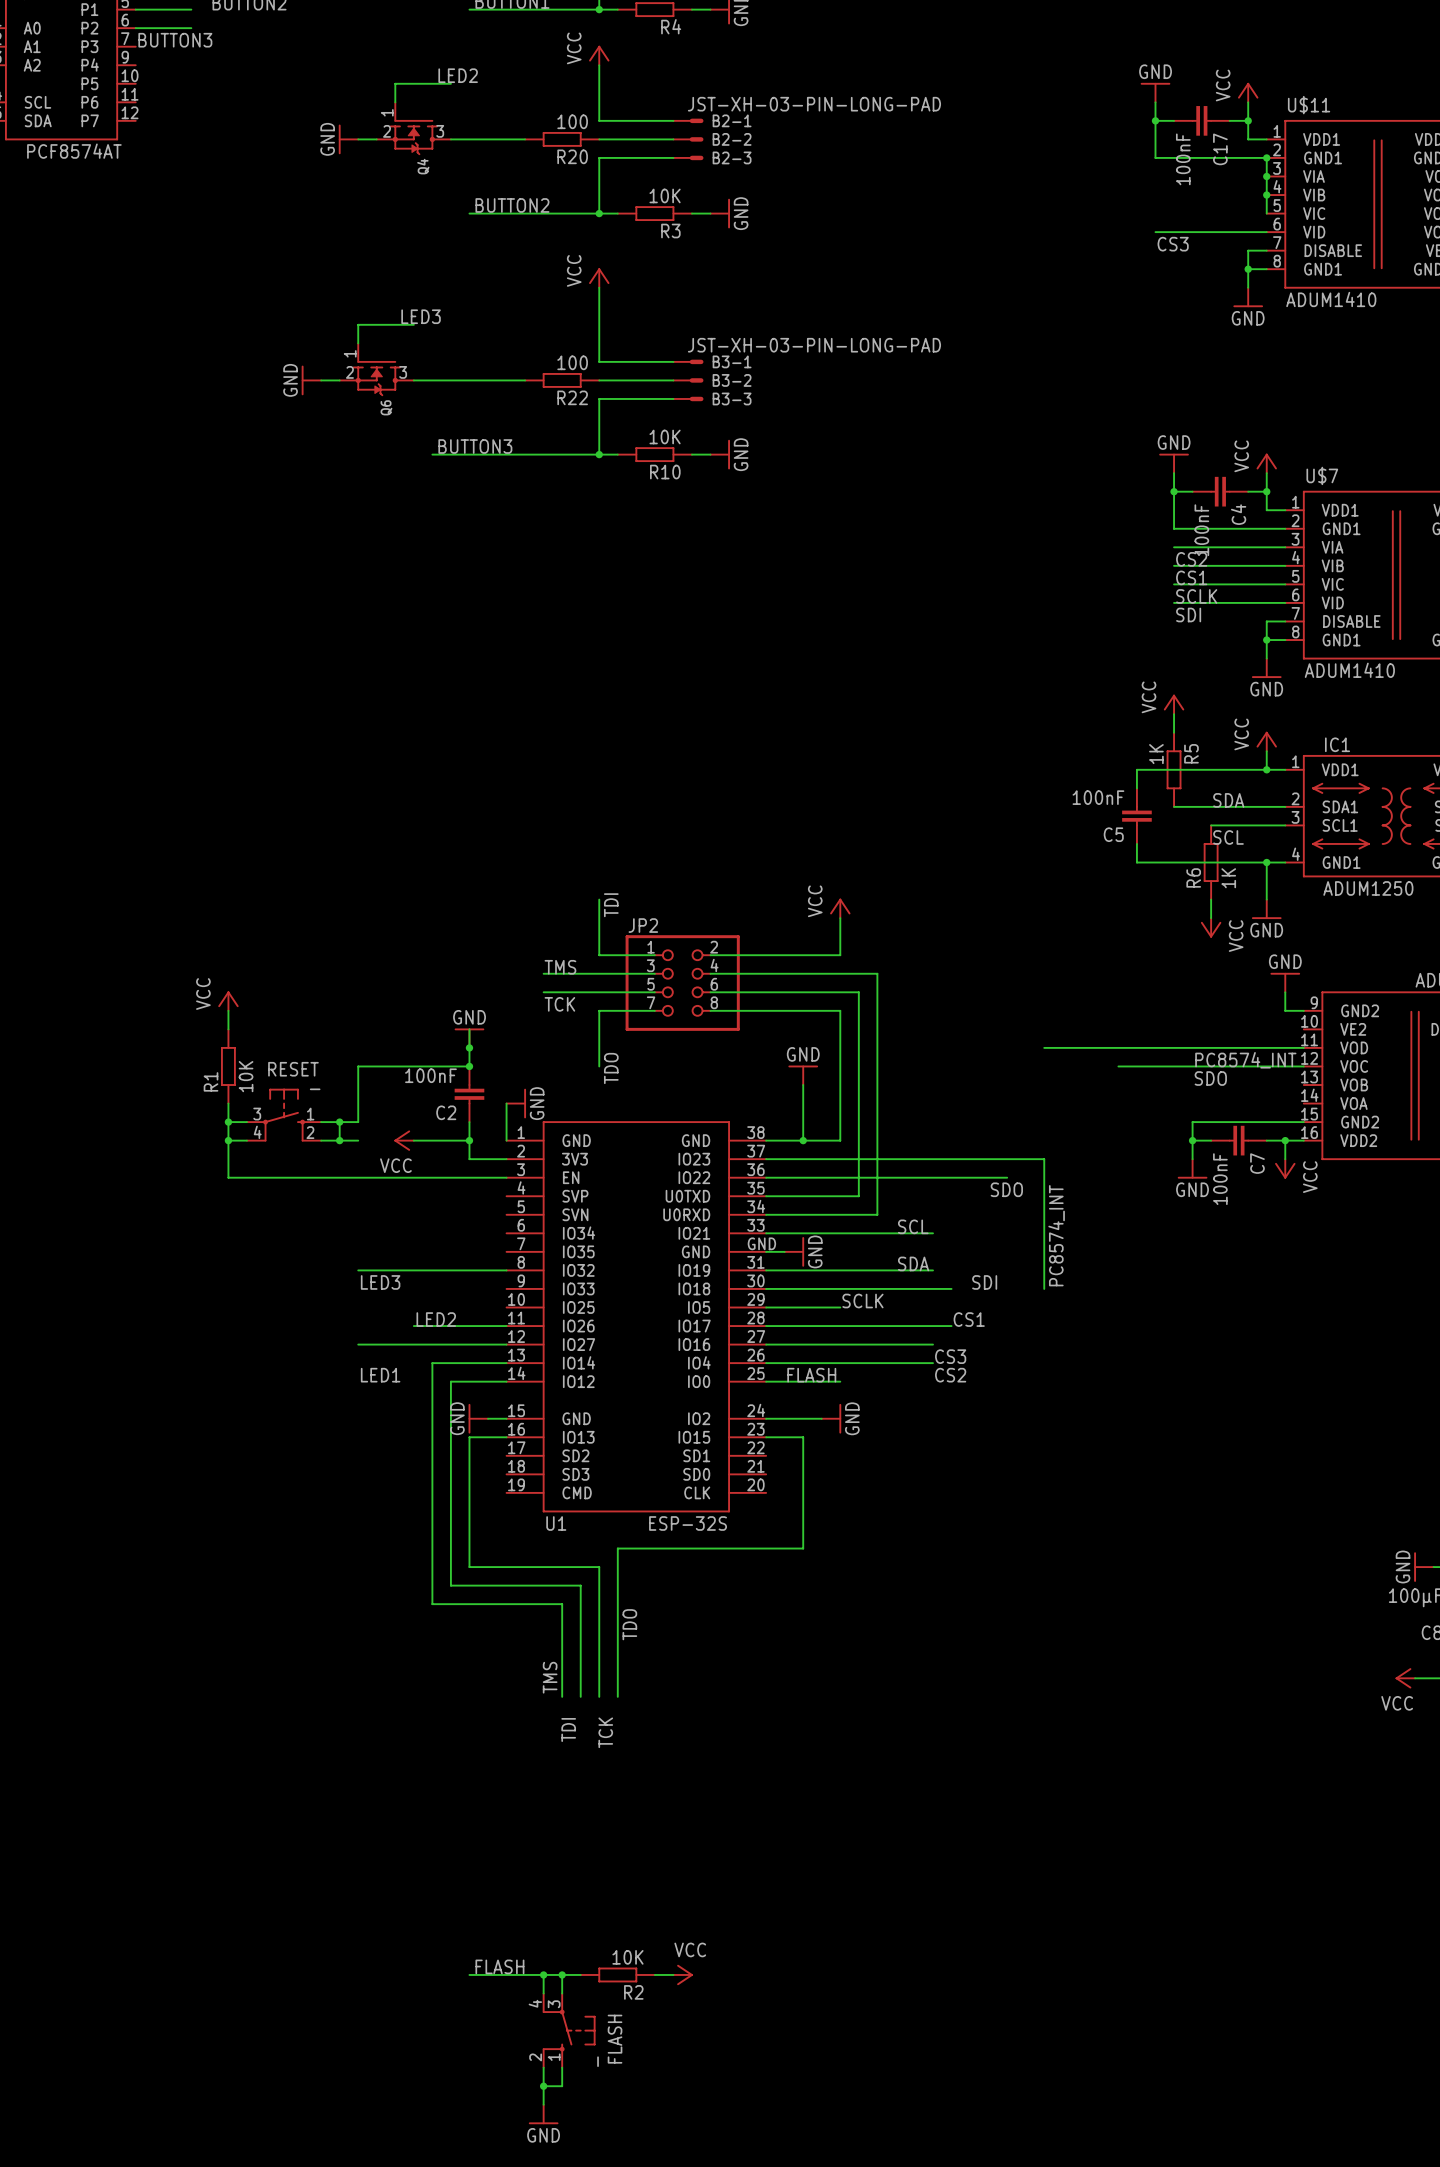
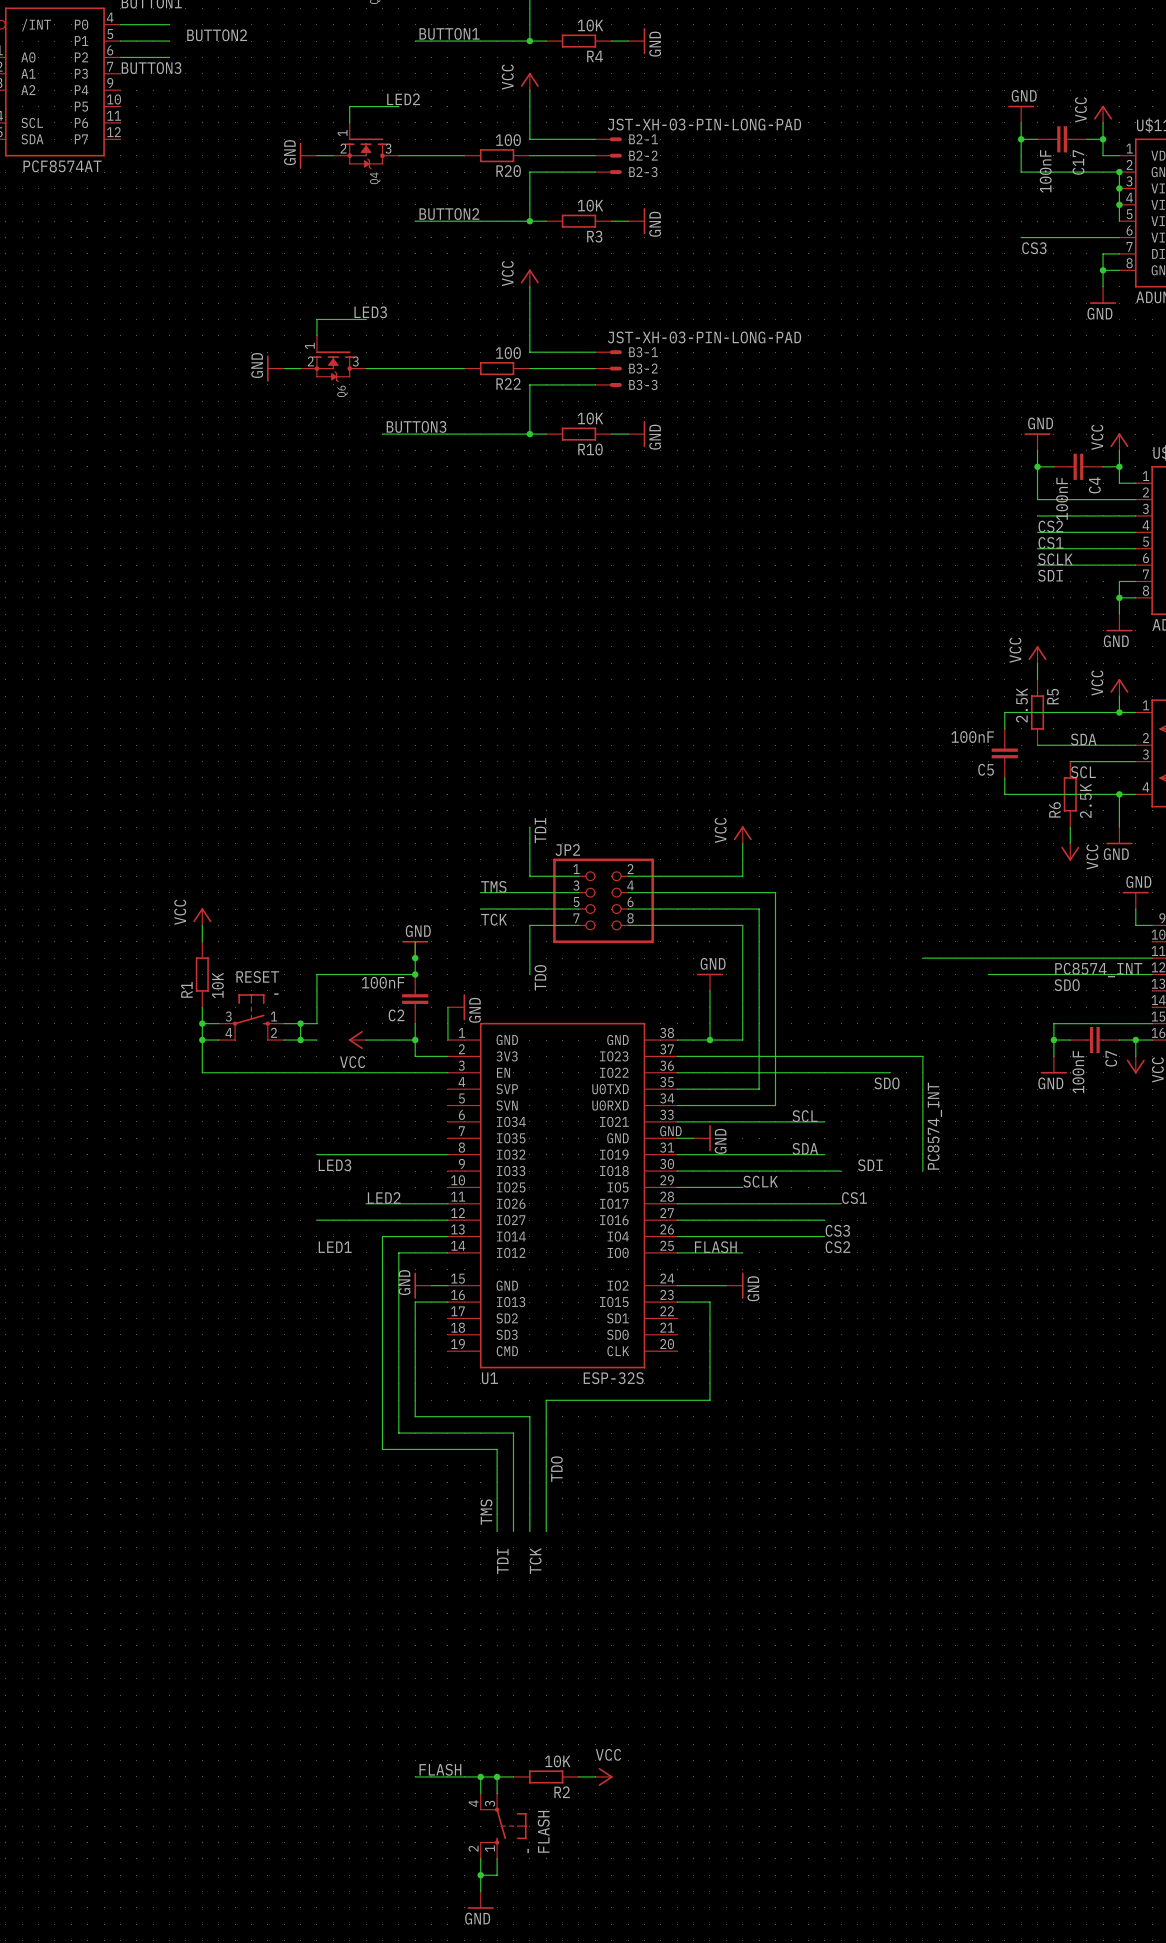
R5 value: 1K (1156, 754) -> 2.5K (1021, 705)
R6 value: 1K (1228, 878) -> 2.5K (1085, 800)

